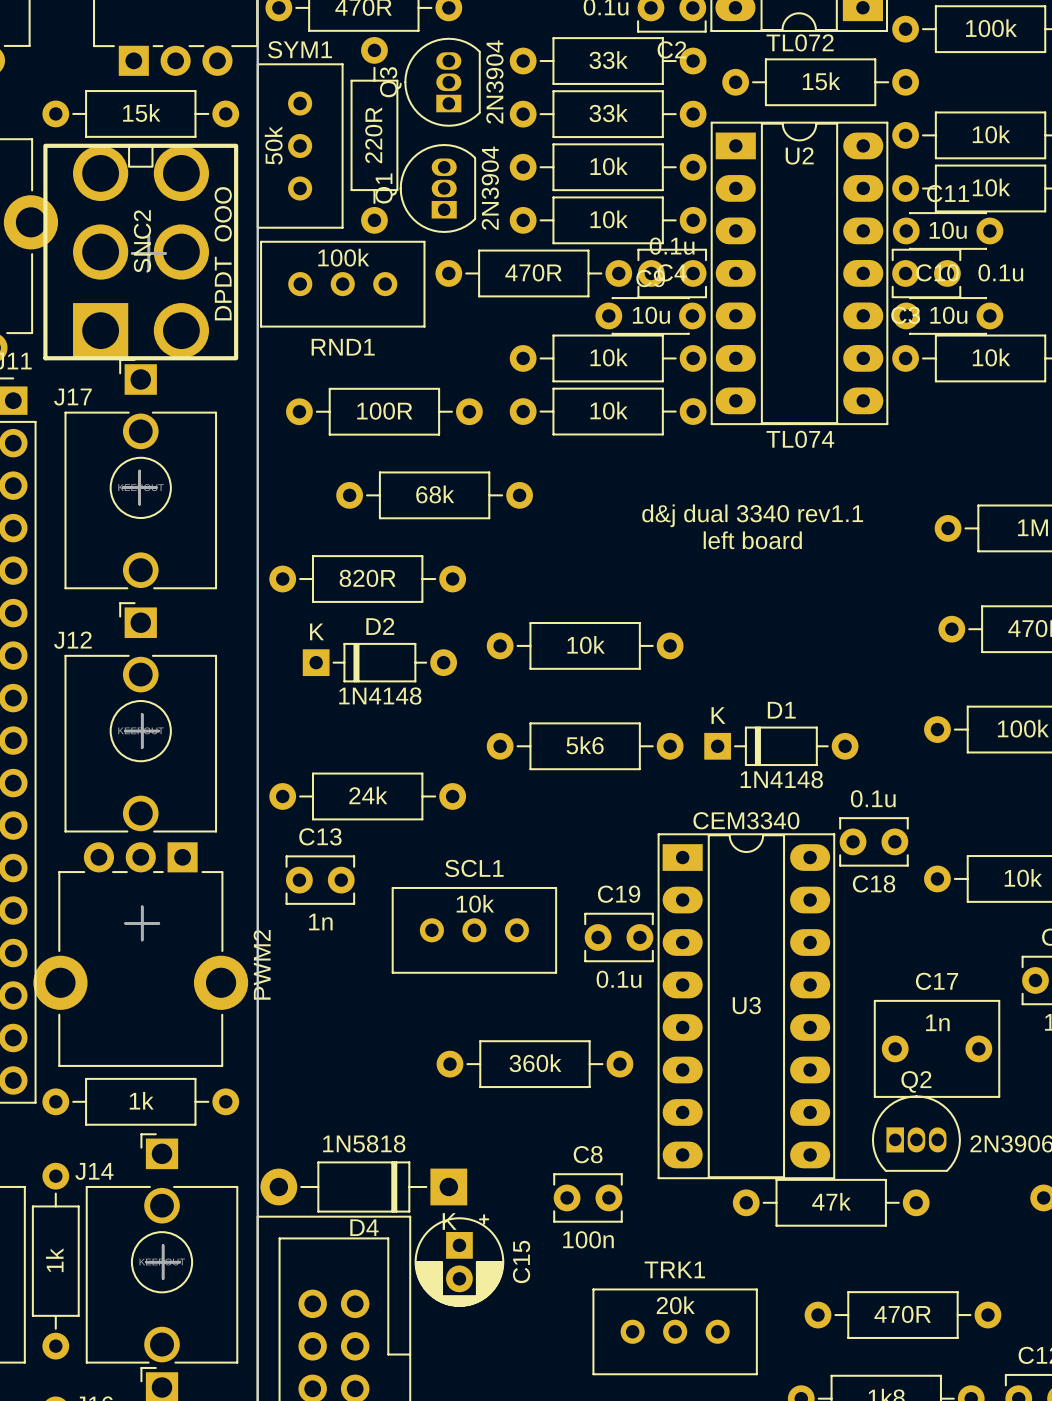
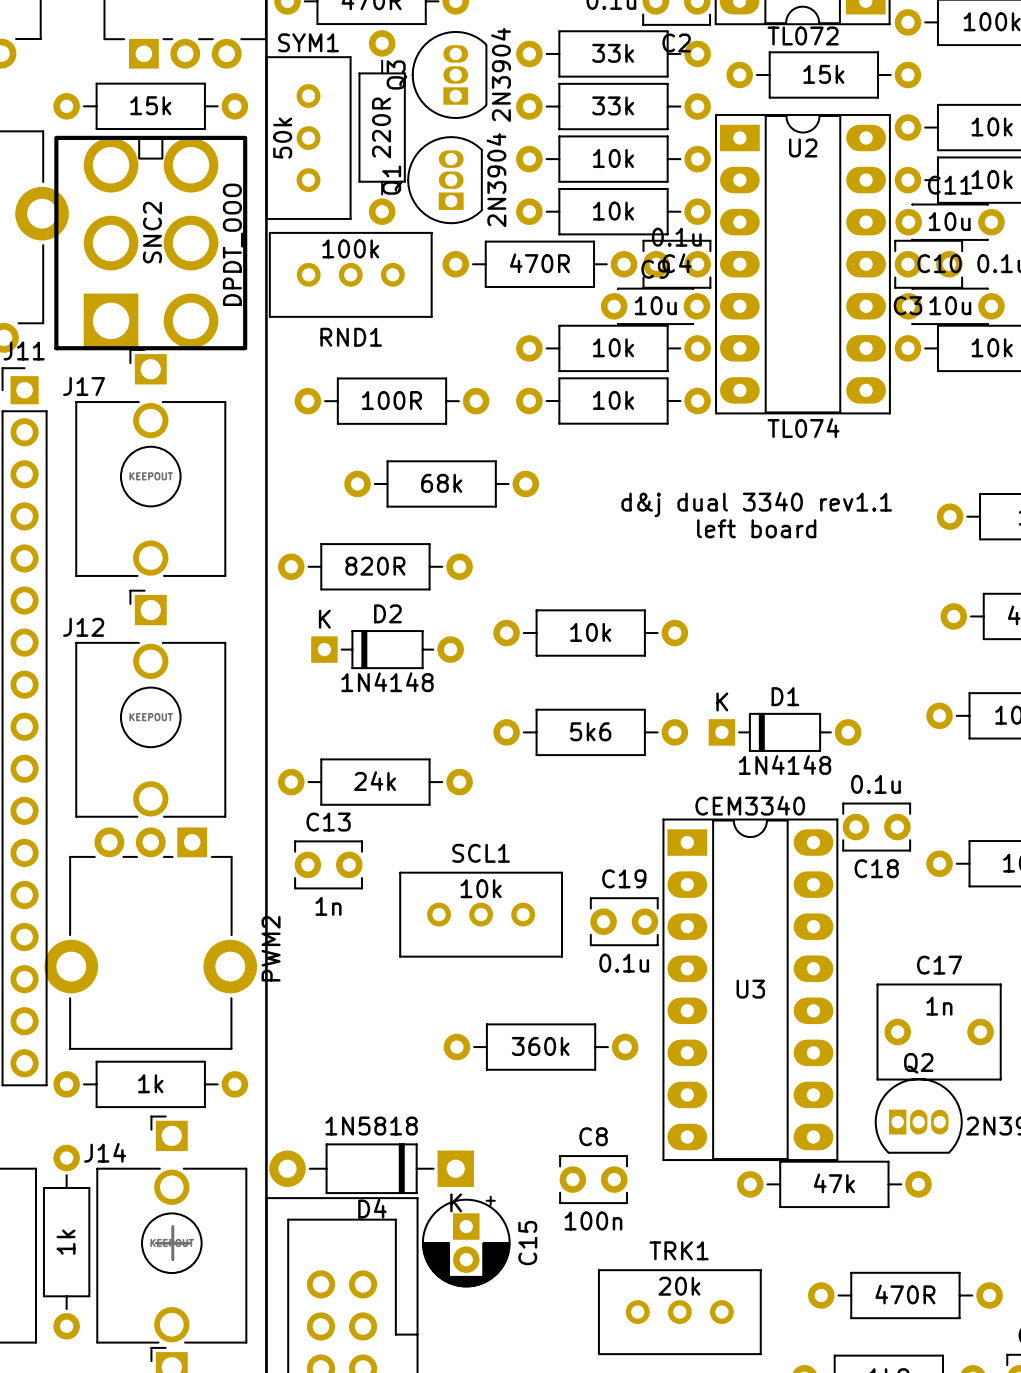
line: (148, 236) (148, 270) -> none
line: (132, 253) (165, 253) -> none
line: (139, 470) (139, 504) -> none
line: (122, 487) (156, 487) -> none
line: (142, 714) (142, 747) -> none
line: (125, 731) (158, 731) -> none
line: (142, 906) (142, 940) -> none
line: (125, 923) (158, 923) -> none

